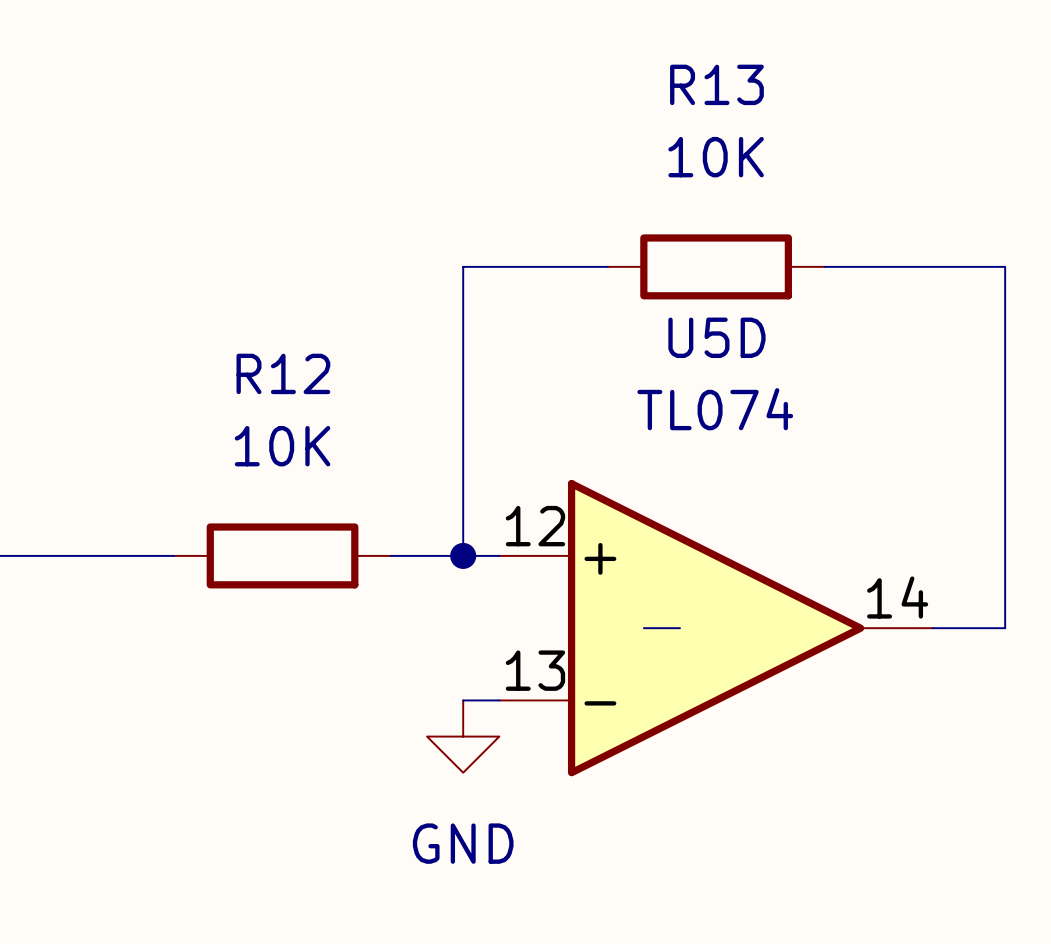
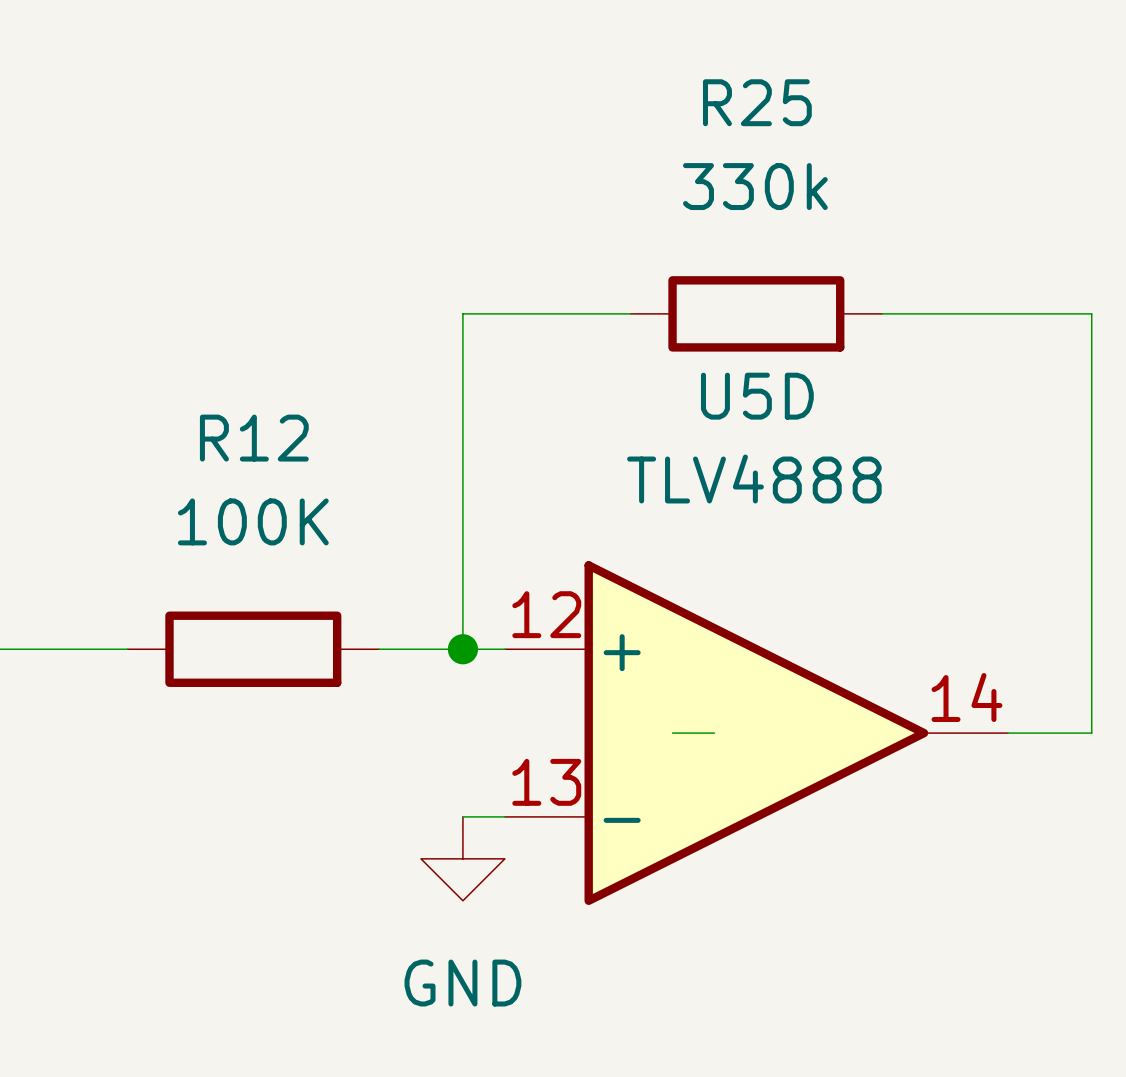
R13 name: R13 (716, 84) -> R25 (757, 102)
R13 value: 10K (716, 157) -> 330k (755, 186)
U5D value: TL074 (715, 409) -> TLV4888 (754, 479)
R12 value: 10K (282, 446) -> 100K (253, 521)

